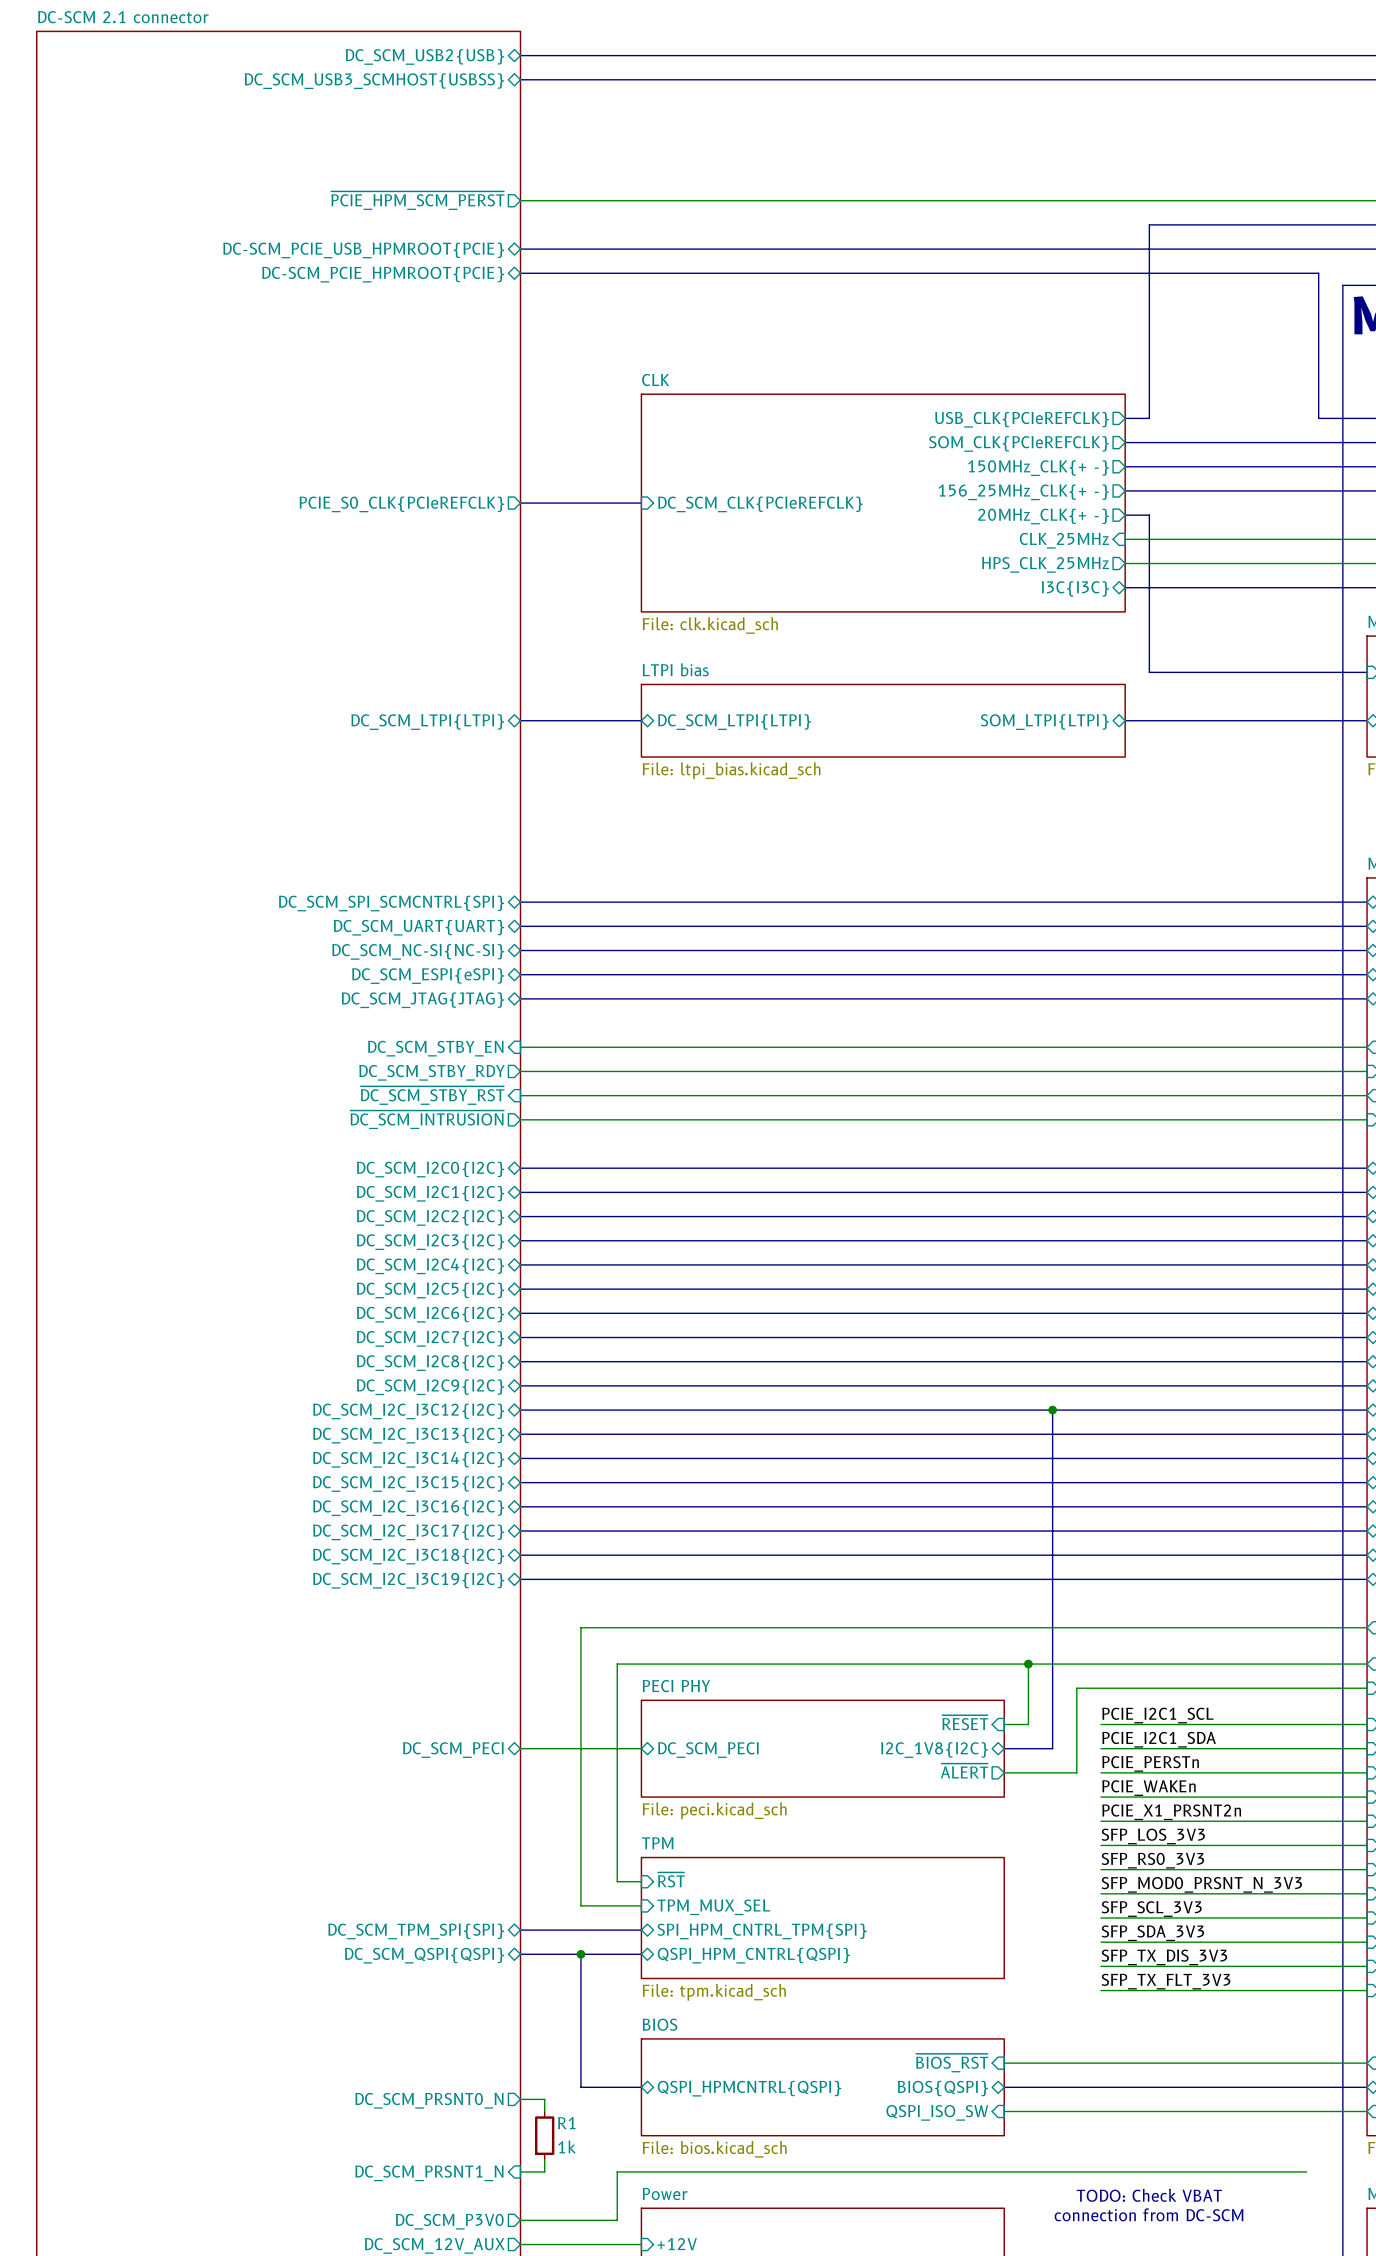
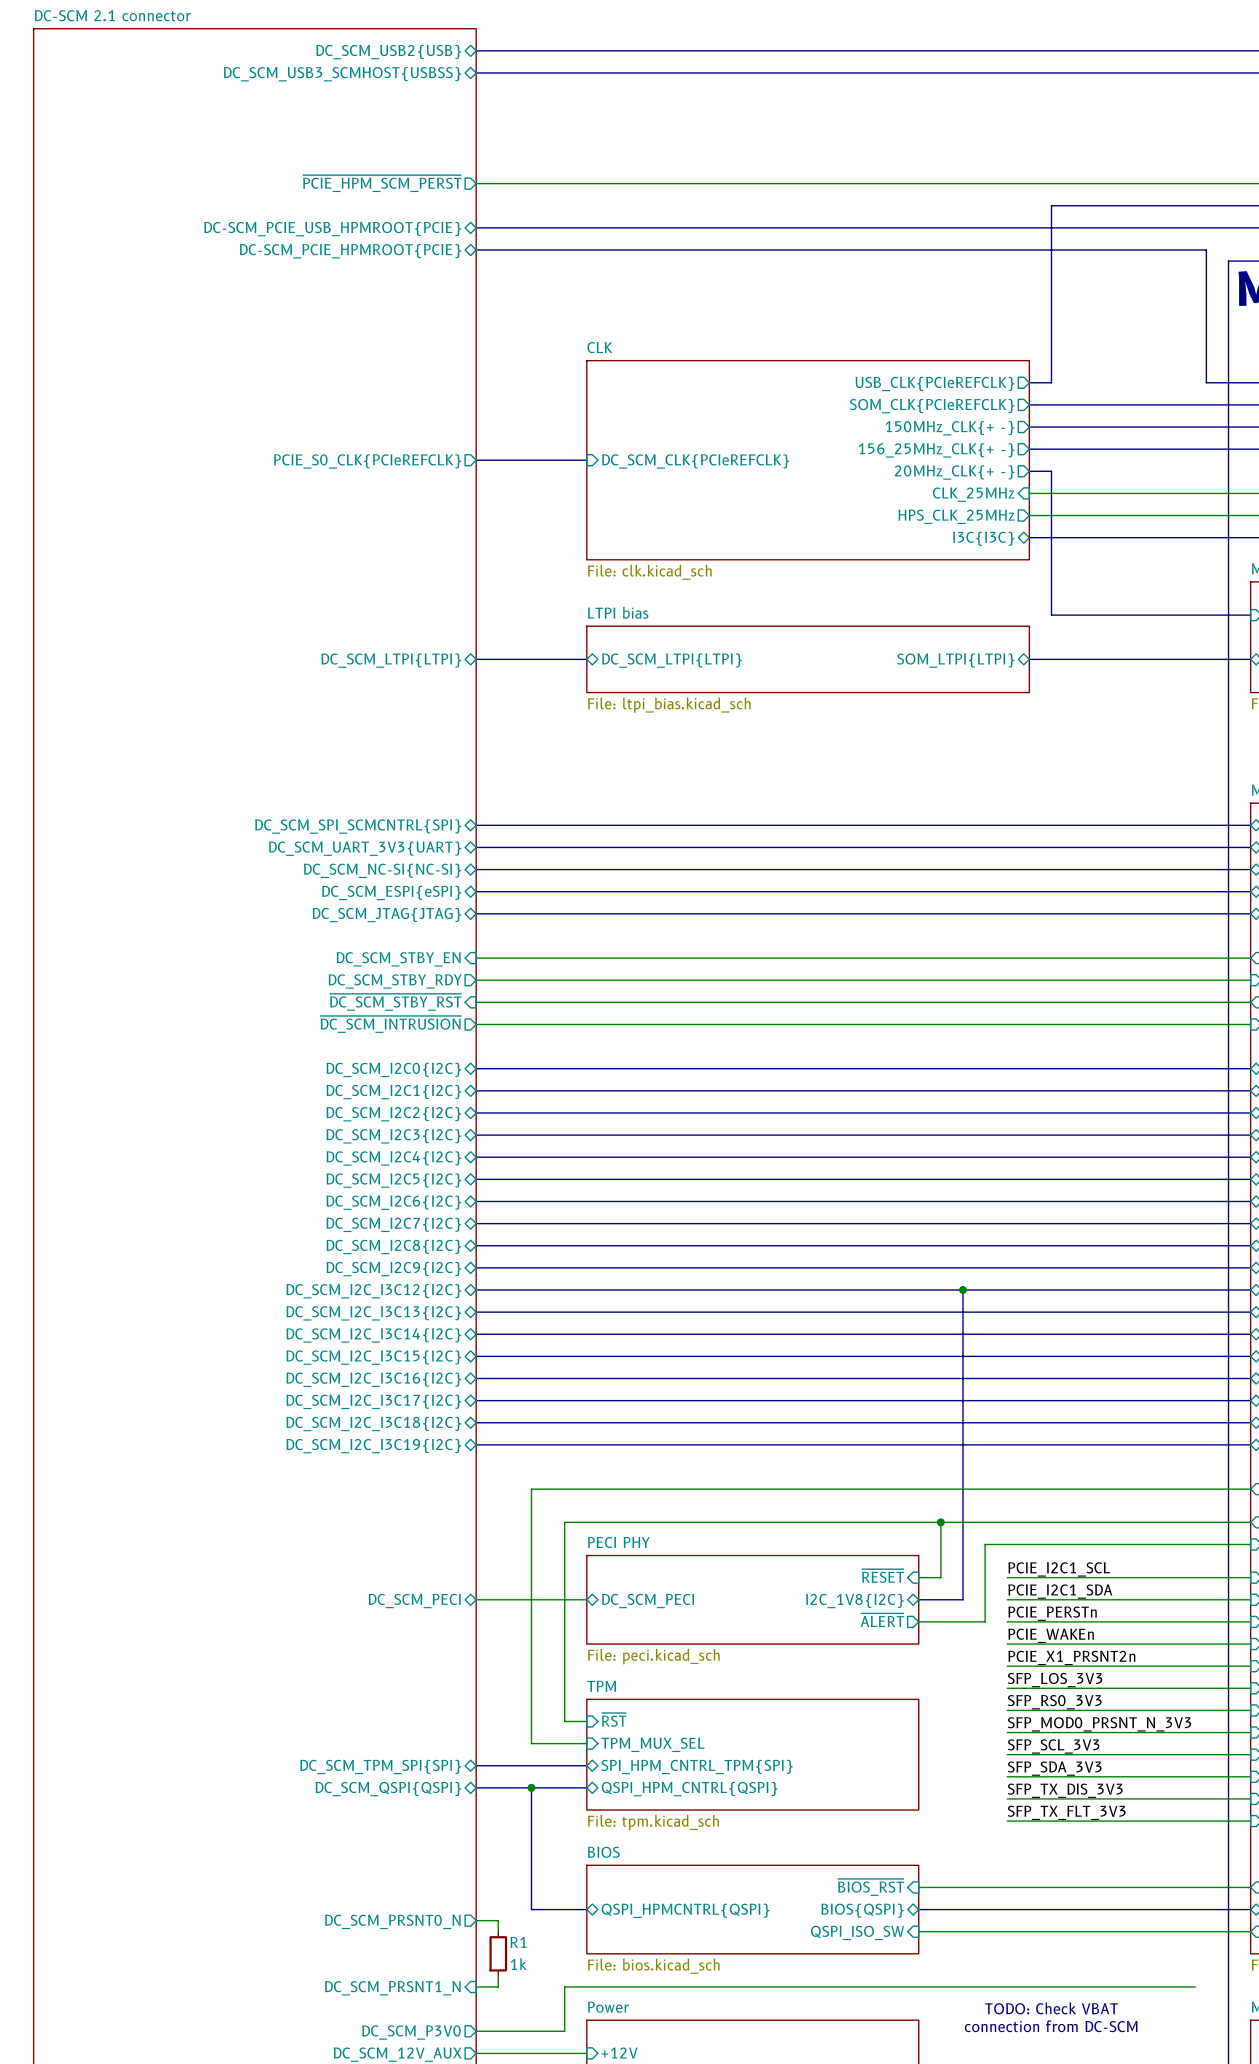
sheet pin: DC_SCM_UART{UART} (418, 927) -> DC_SCM_UART_3V3{UART} (365, 848)

